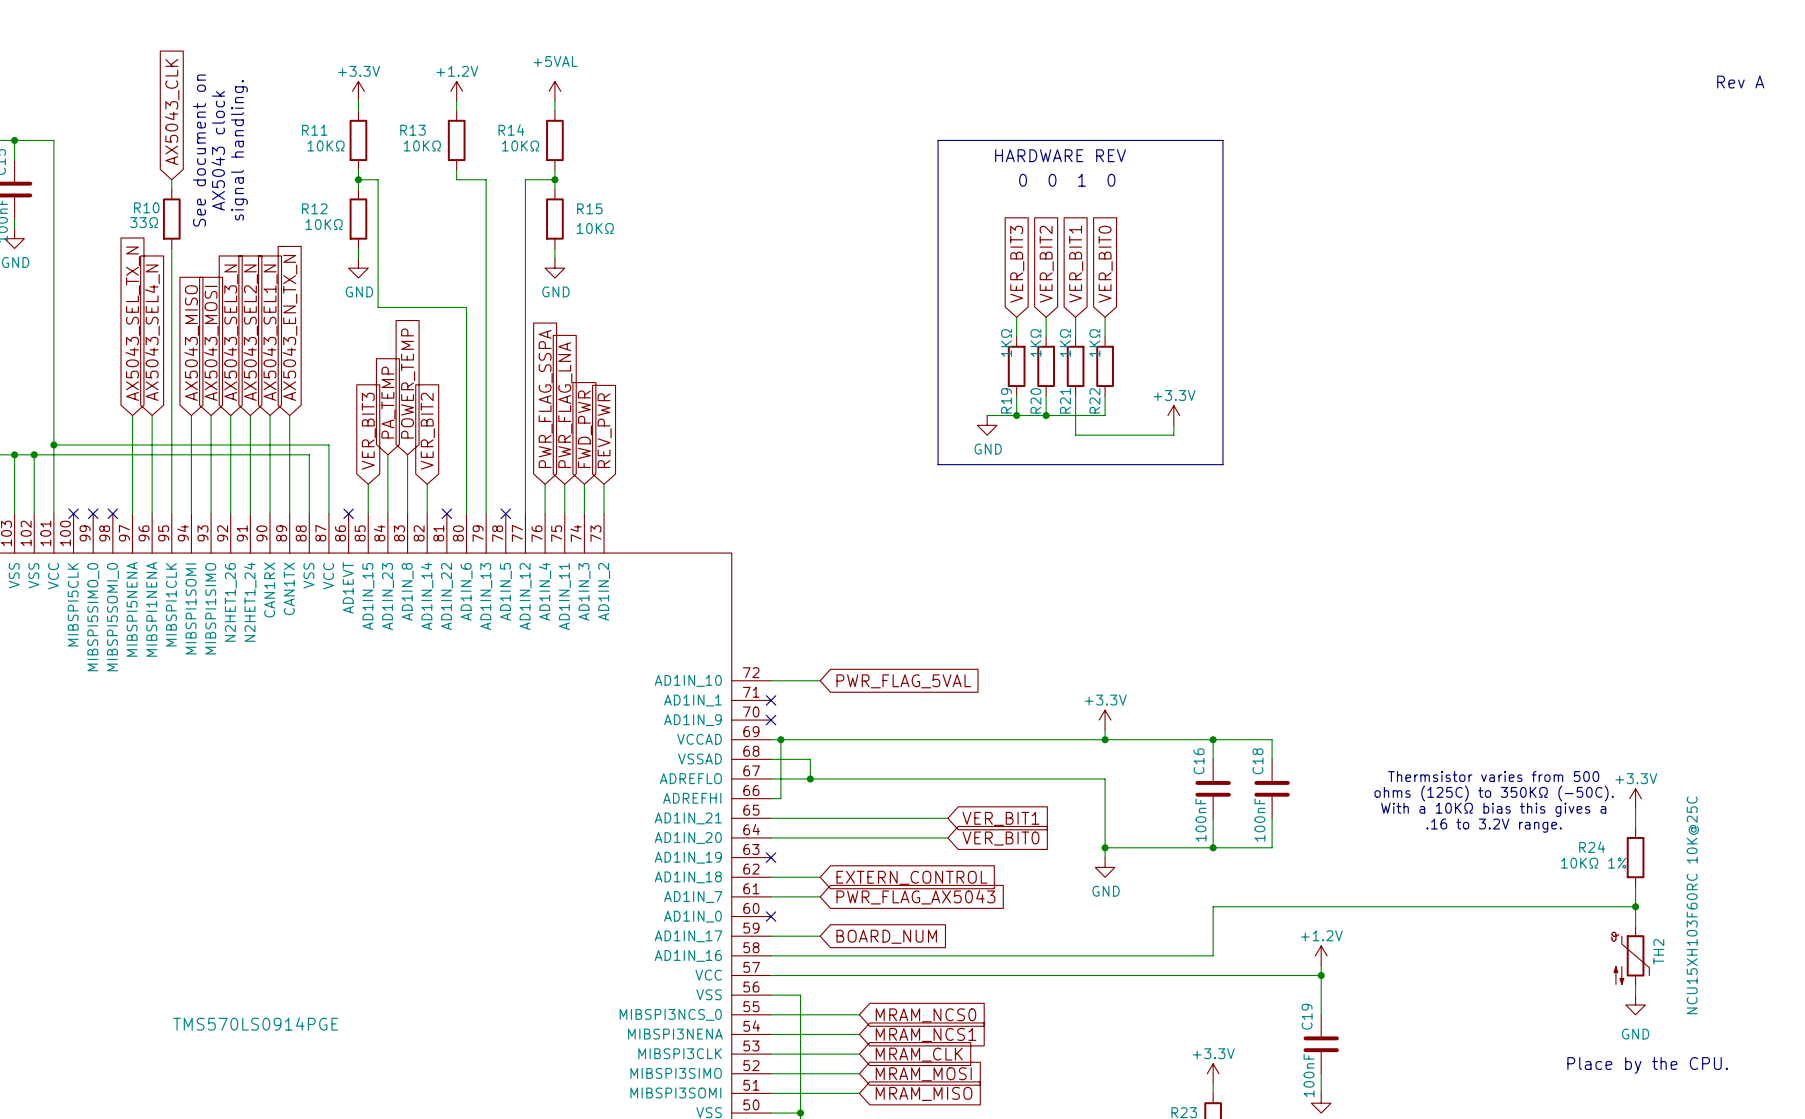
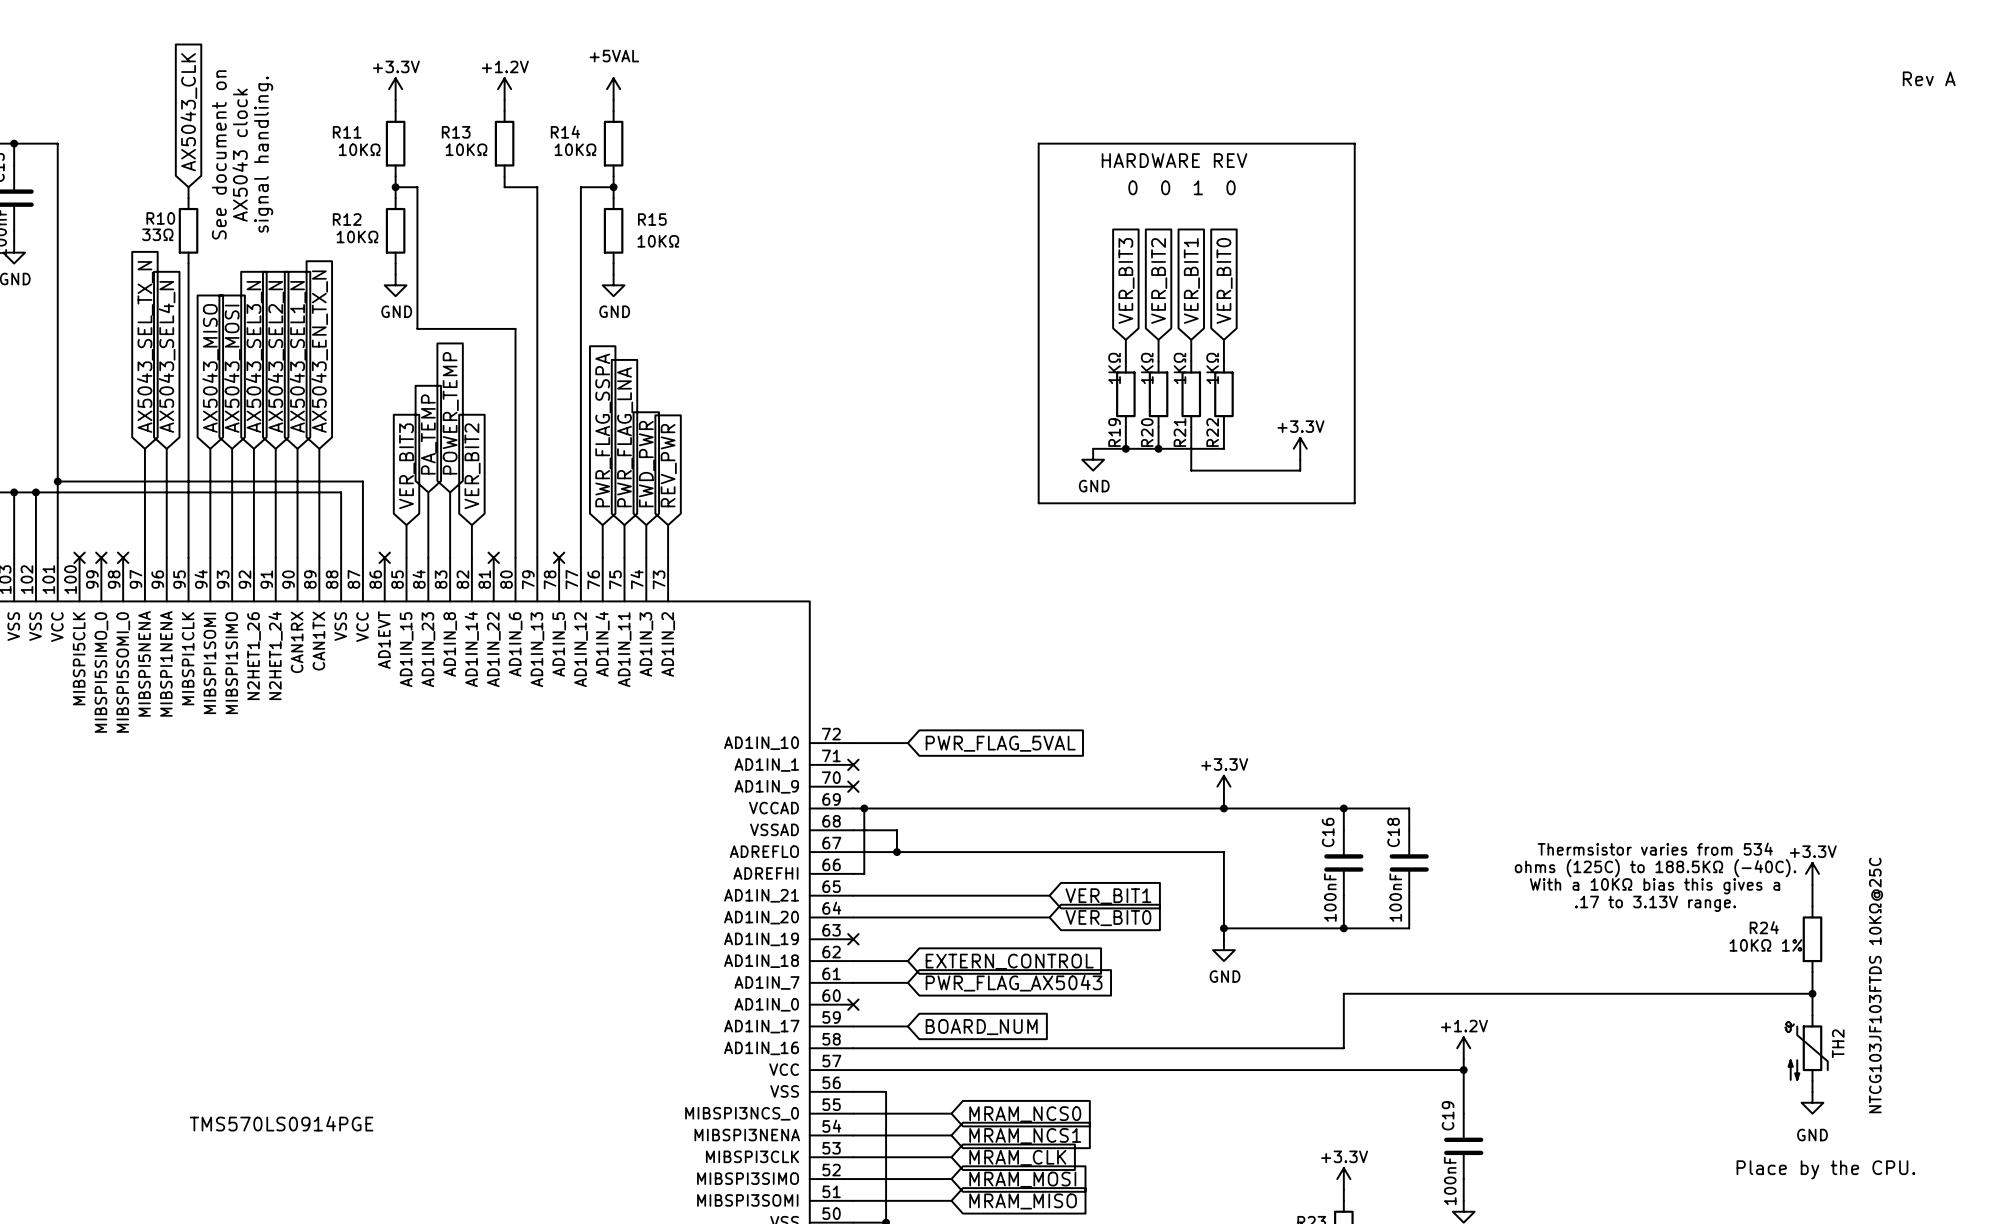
text: Thermsistor varies from 500 (1493, 776) -> Thermsistor varies from 534 (1655, 849)
text: ohms (125C) to 350KΩ (-50C). (1494, 793) -> ohms (125C) to 188.5KΩ (-40C). (1655, 868)
text: .16 to 3.2V range. (1494, 825) -> .17 to 3.13V range. (1655, 903)
TH2 value: NCU15XH103F60RC 10K@25C (1692, 905) -> NTCG103JF103FTDS 10KΩ@25C (1876, 985)

